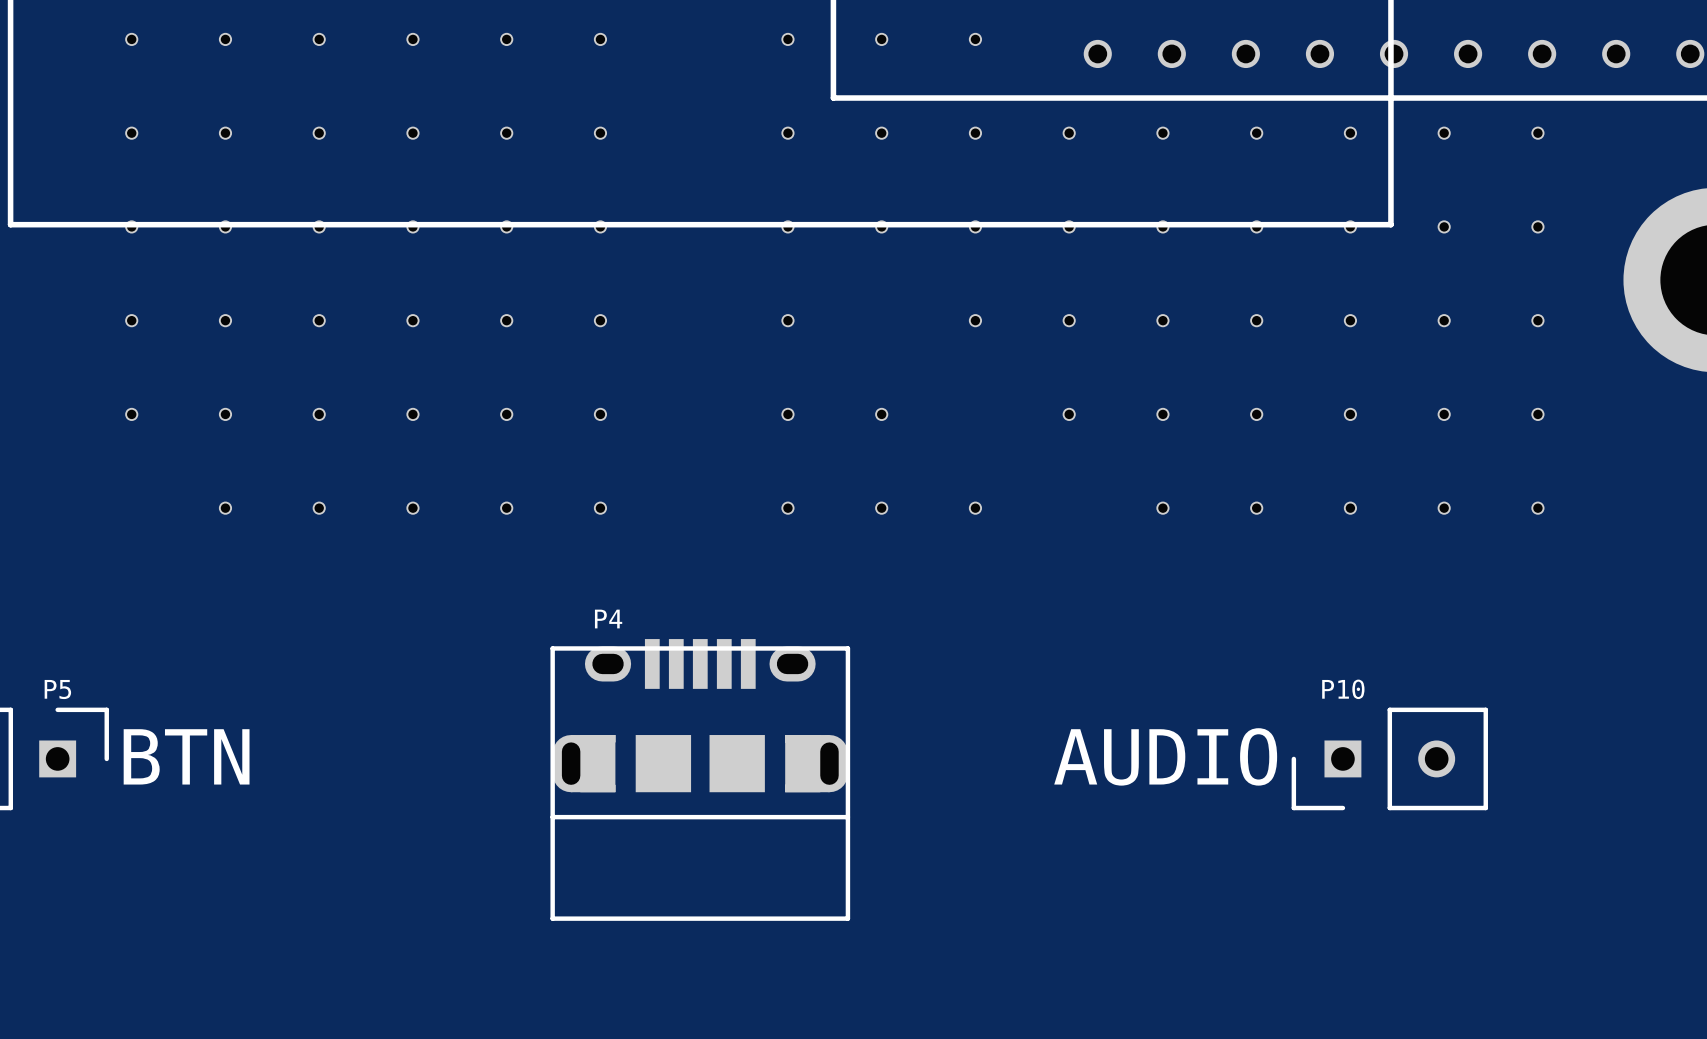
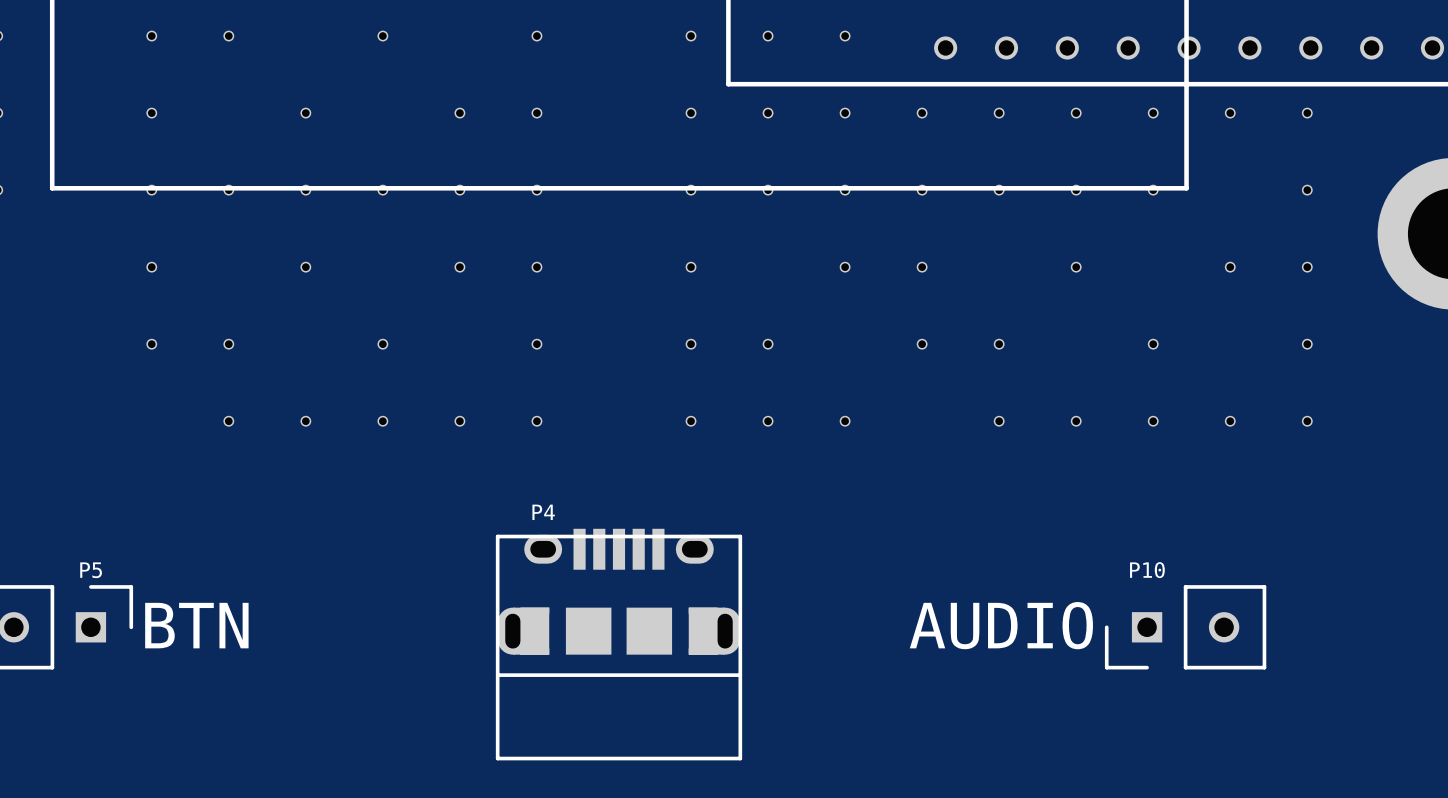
part: (319, 39) -> none
part: (506, 39) -> none
part: (225, 133) -> none
part: (412, 133) -> none
part: (1444, 226) -> none
part: (225, 320) -> none
part: (412, 320) -> none
part: (1162, 320) -> none
part: (1350, 320) -> none
part: (319, 414) -> none
part: (506, 414) -> none
part: (1256, 414) -> none
part: (1444, 414) -> none

